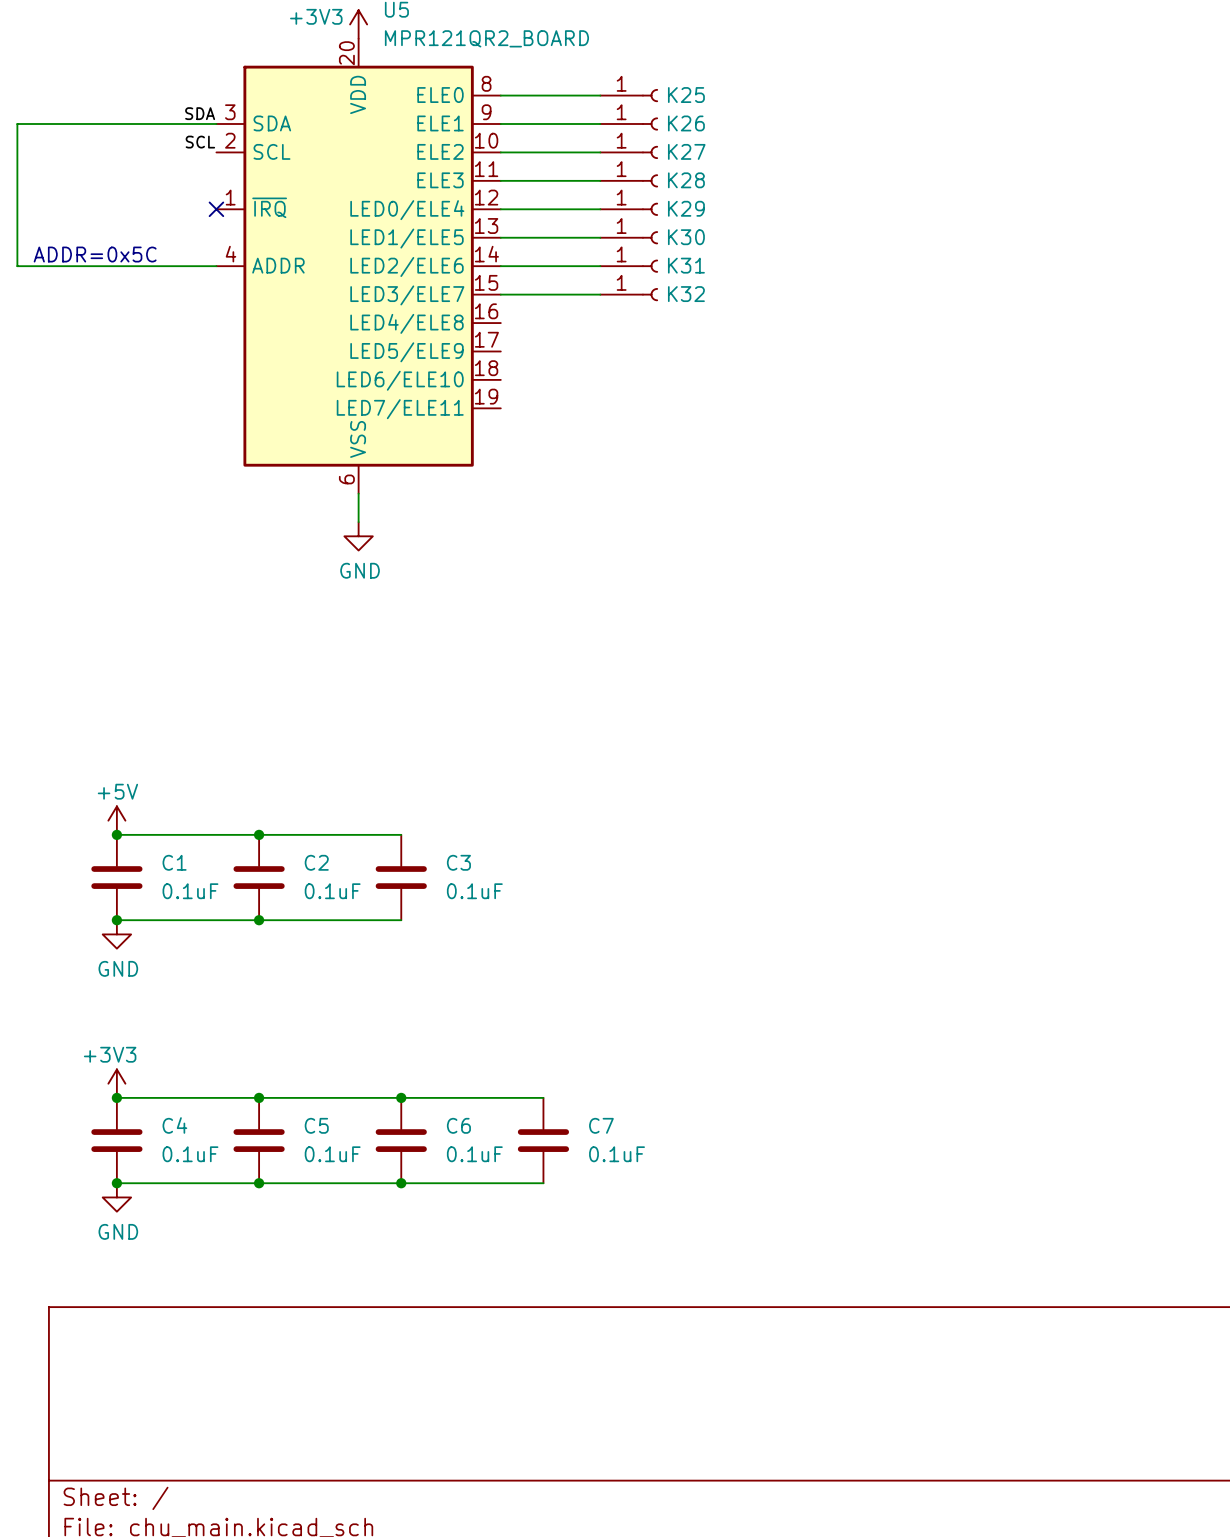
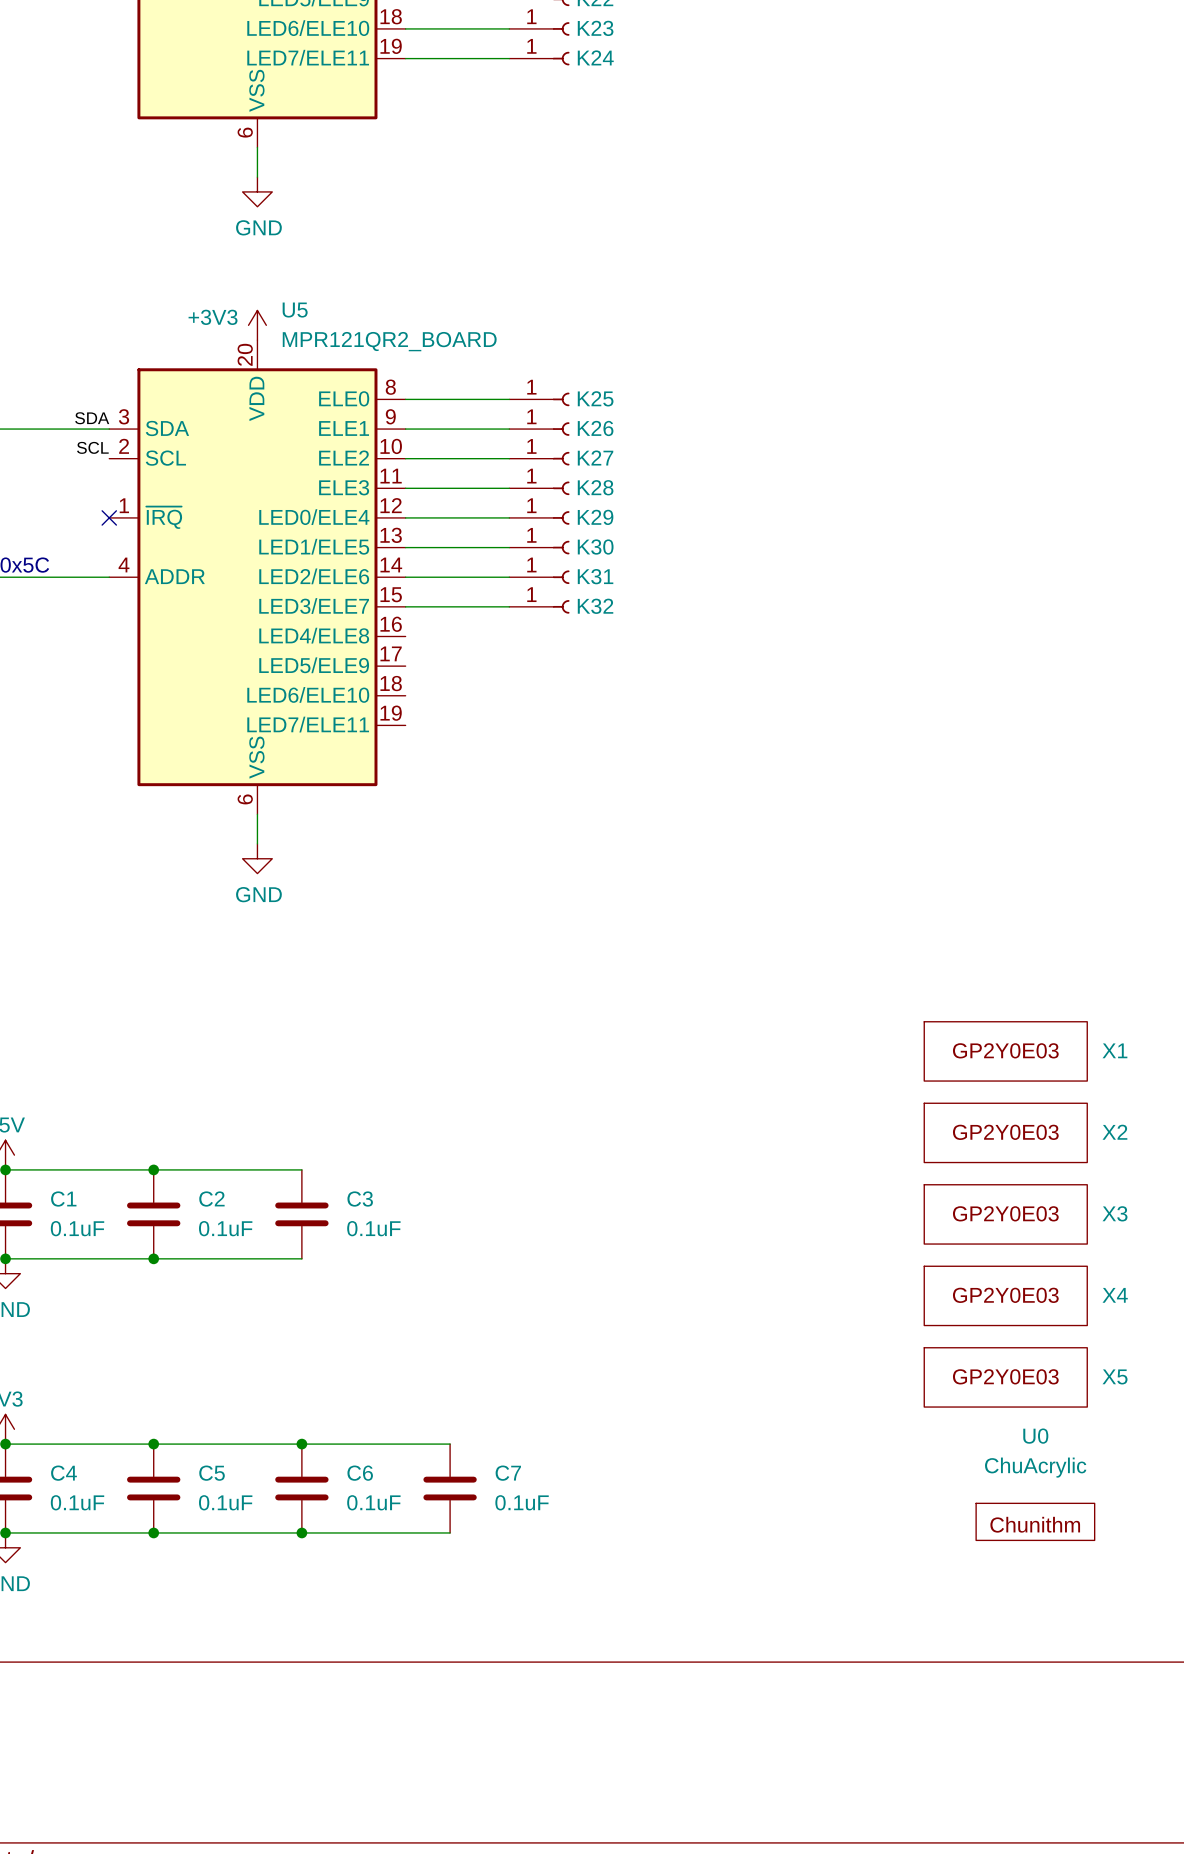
X1: none -> (1005, 1051)
X2: none -> (1005, 1132)
X3: none -> (1005, 1214)
X4: none -> (1005, 1295)
X5: none -> (1005, 1377)
U0: none -> ChuAcrylic (1035, 1521)

